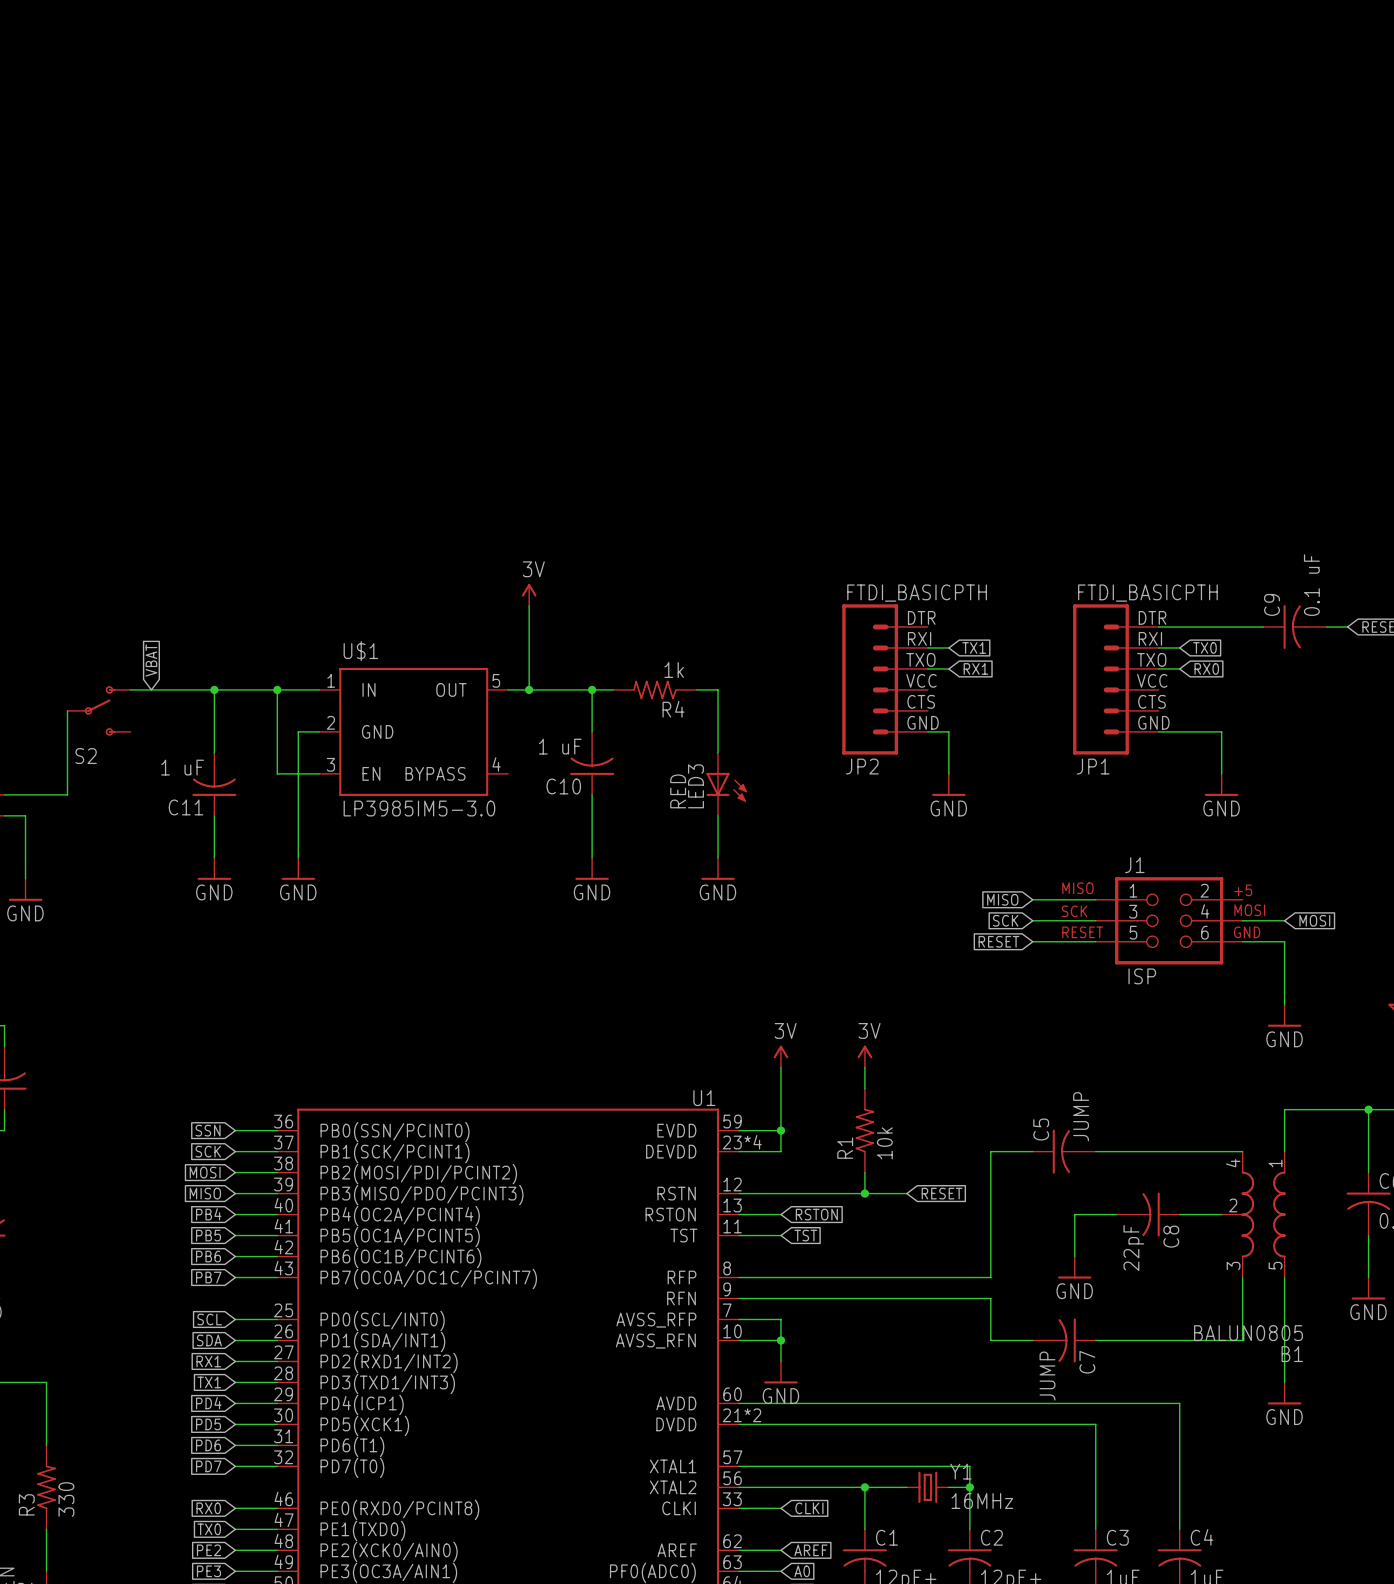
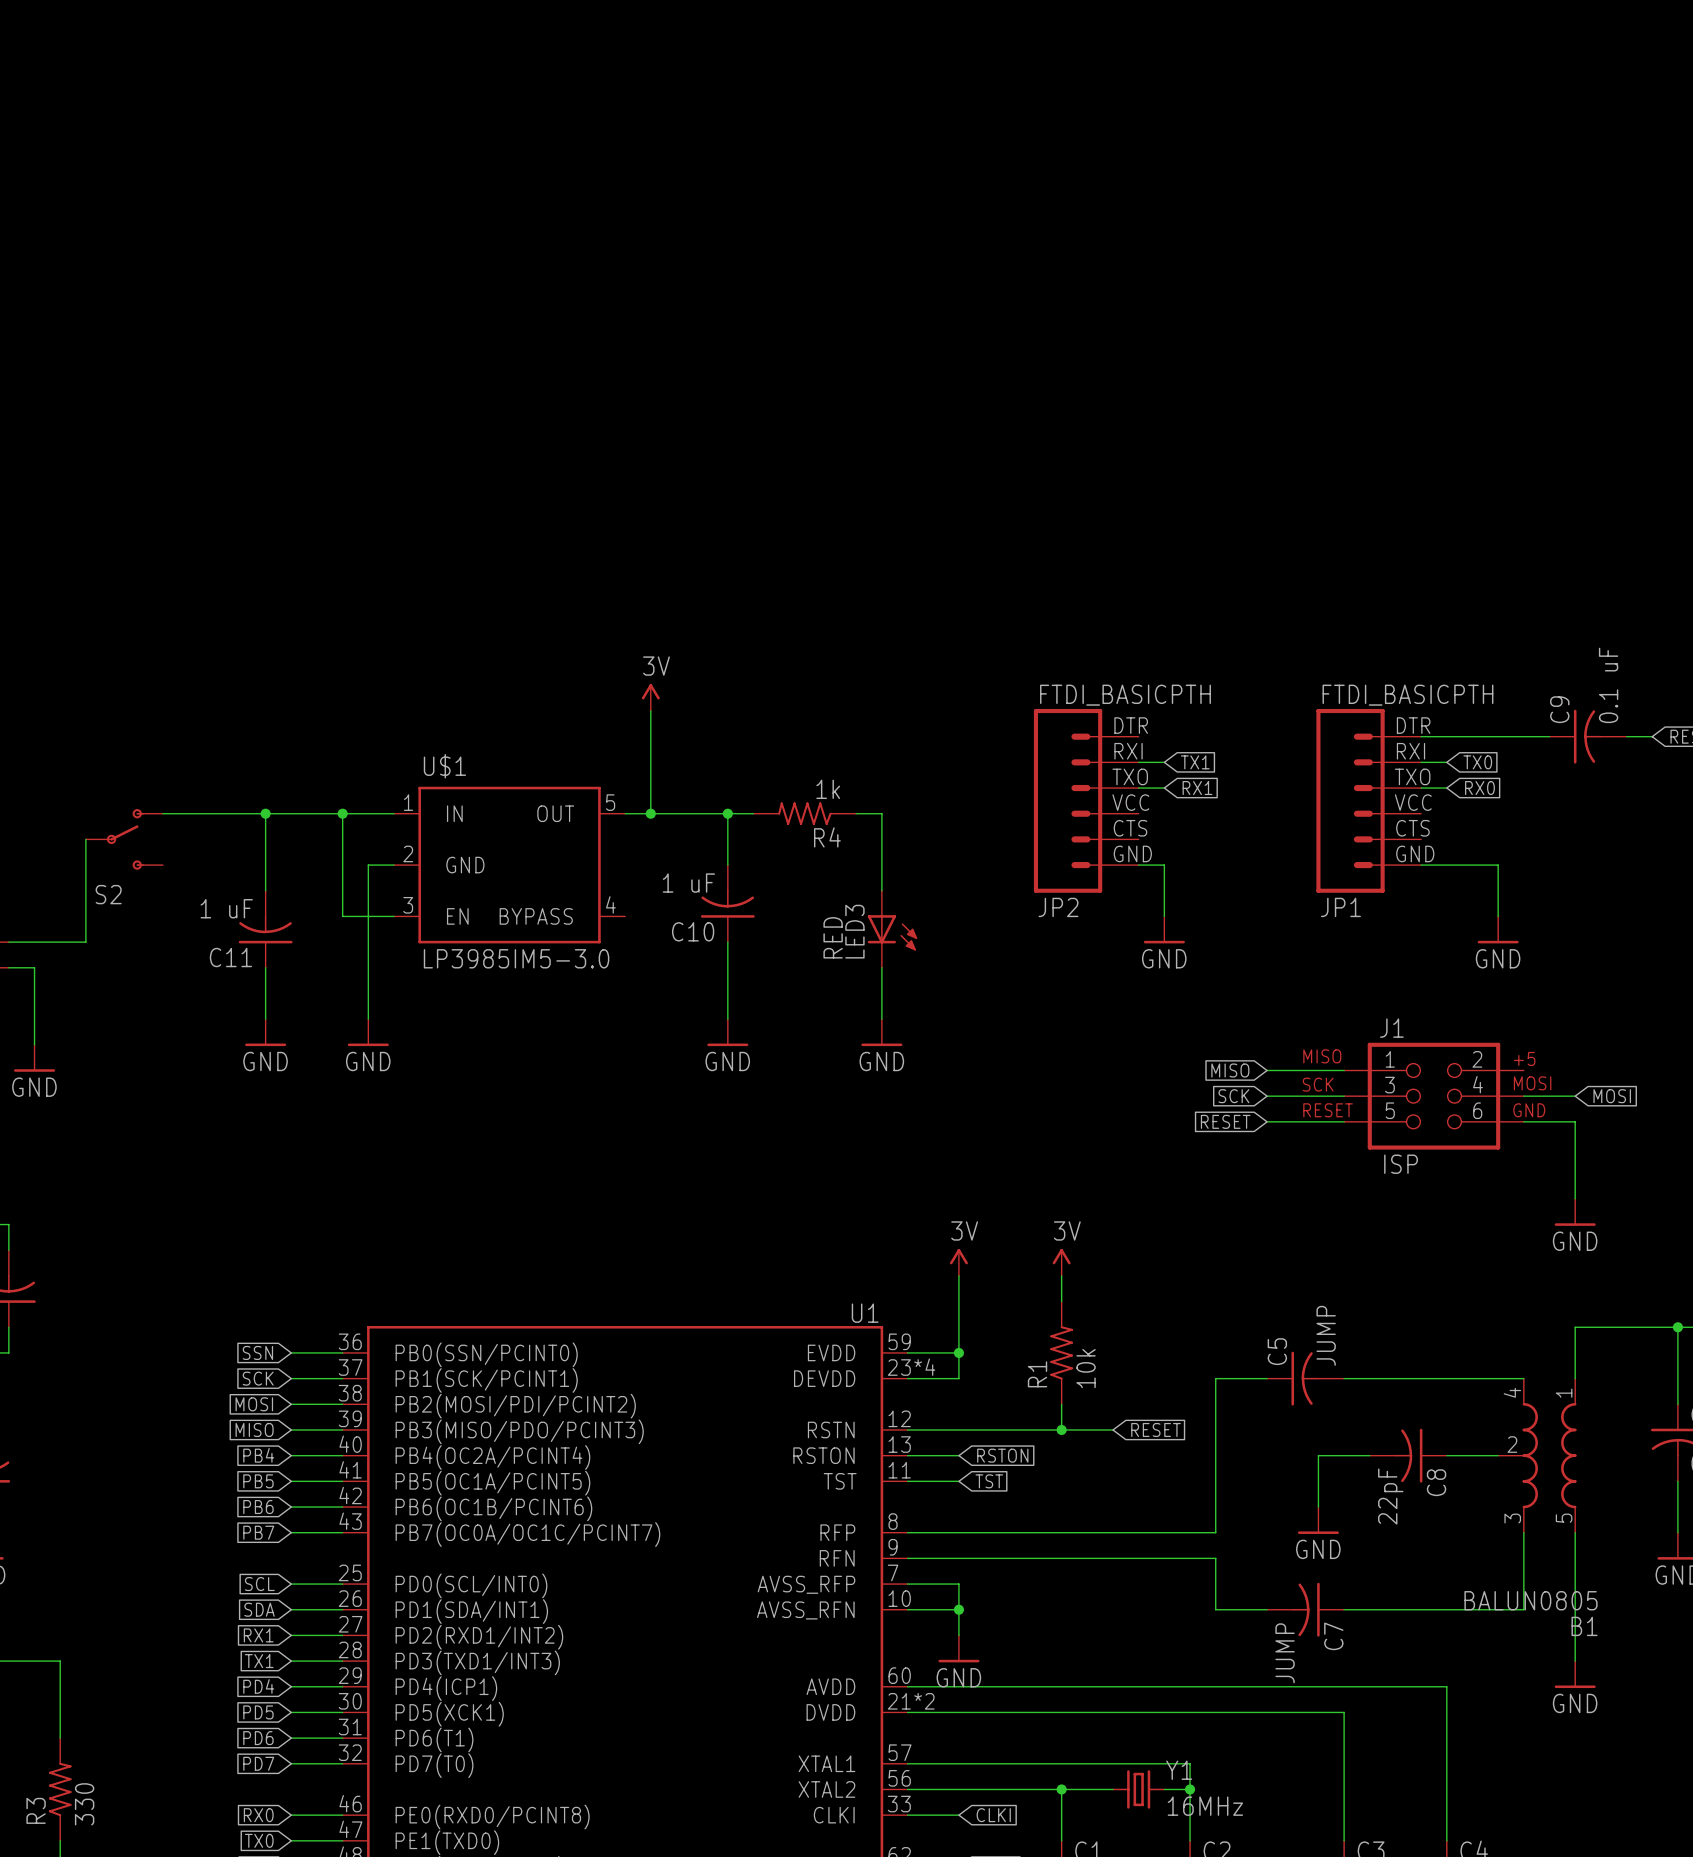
global label: VBAT (151, 660) -> none

